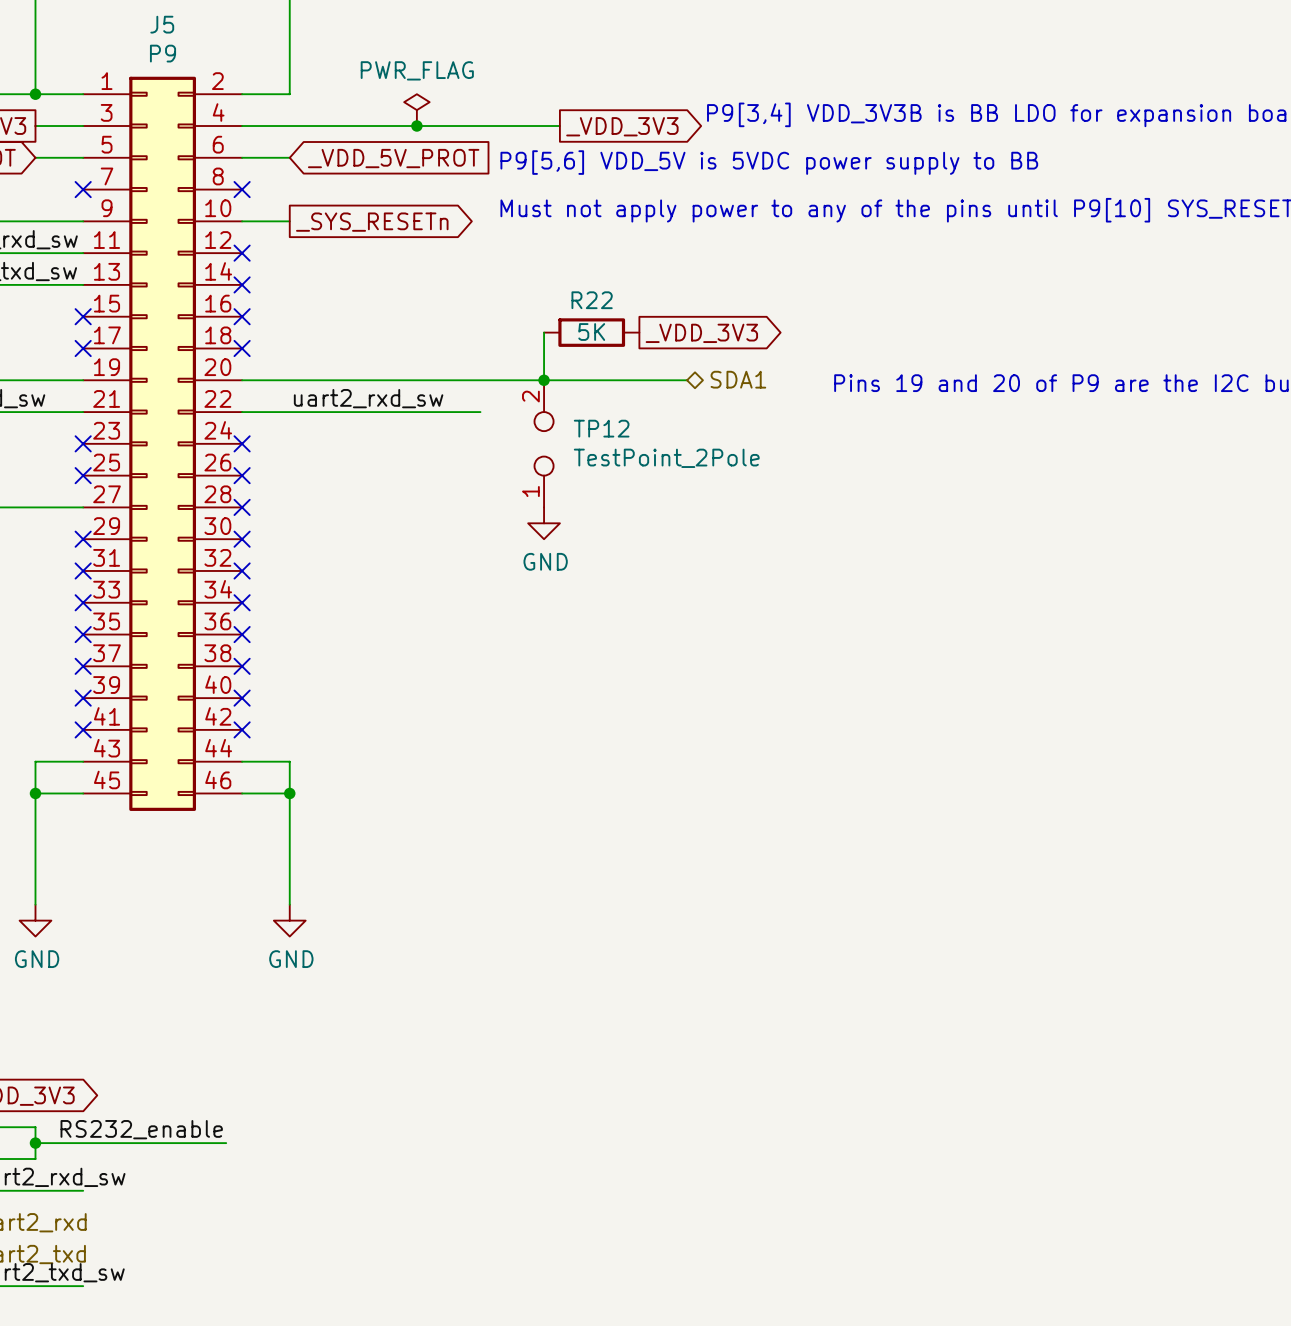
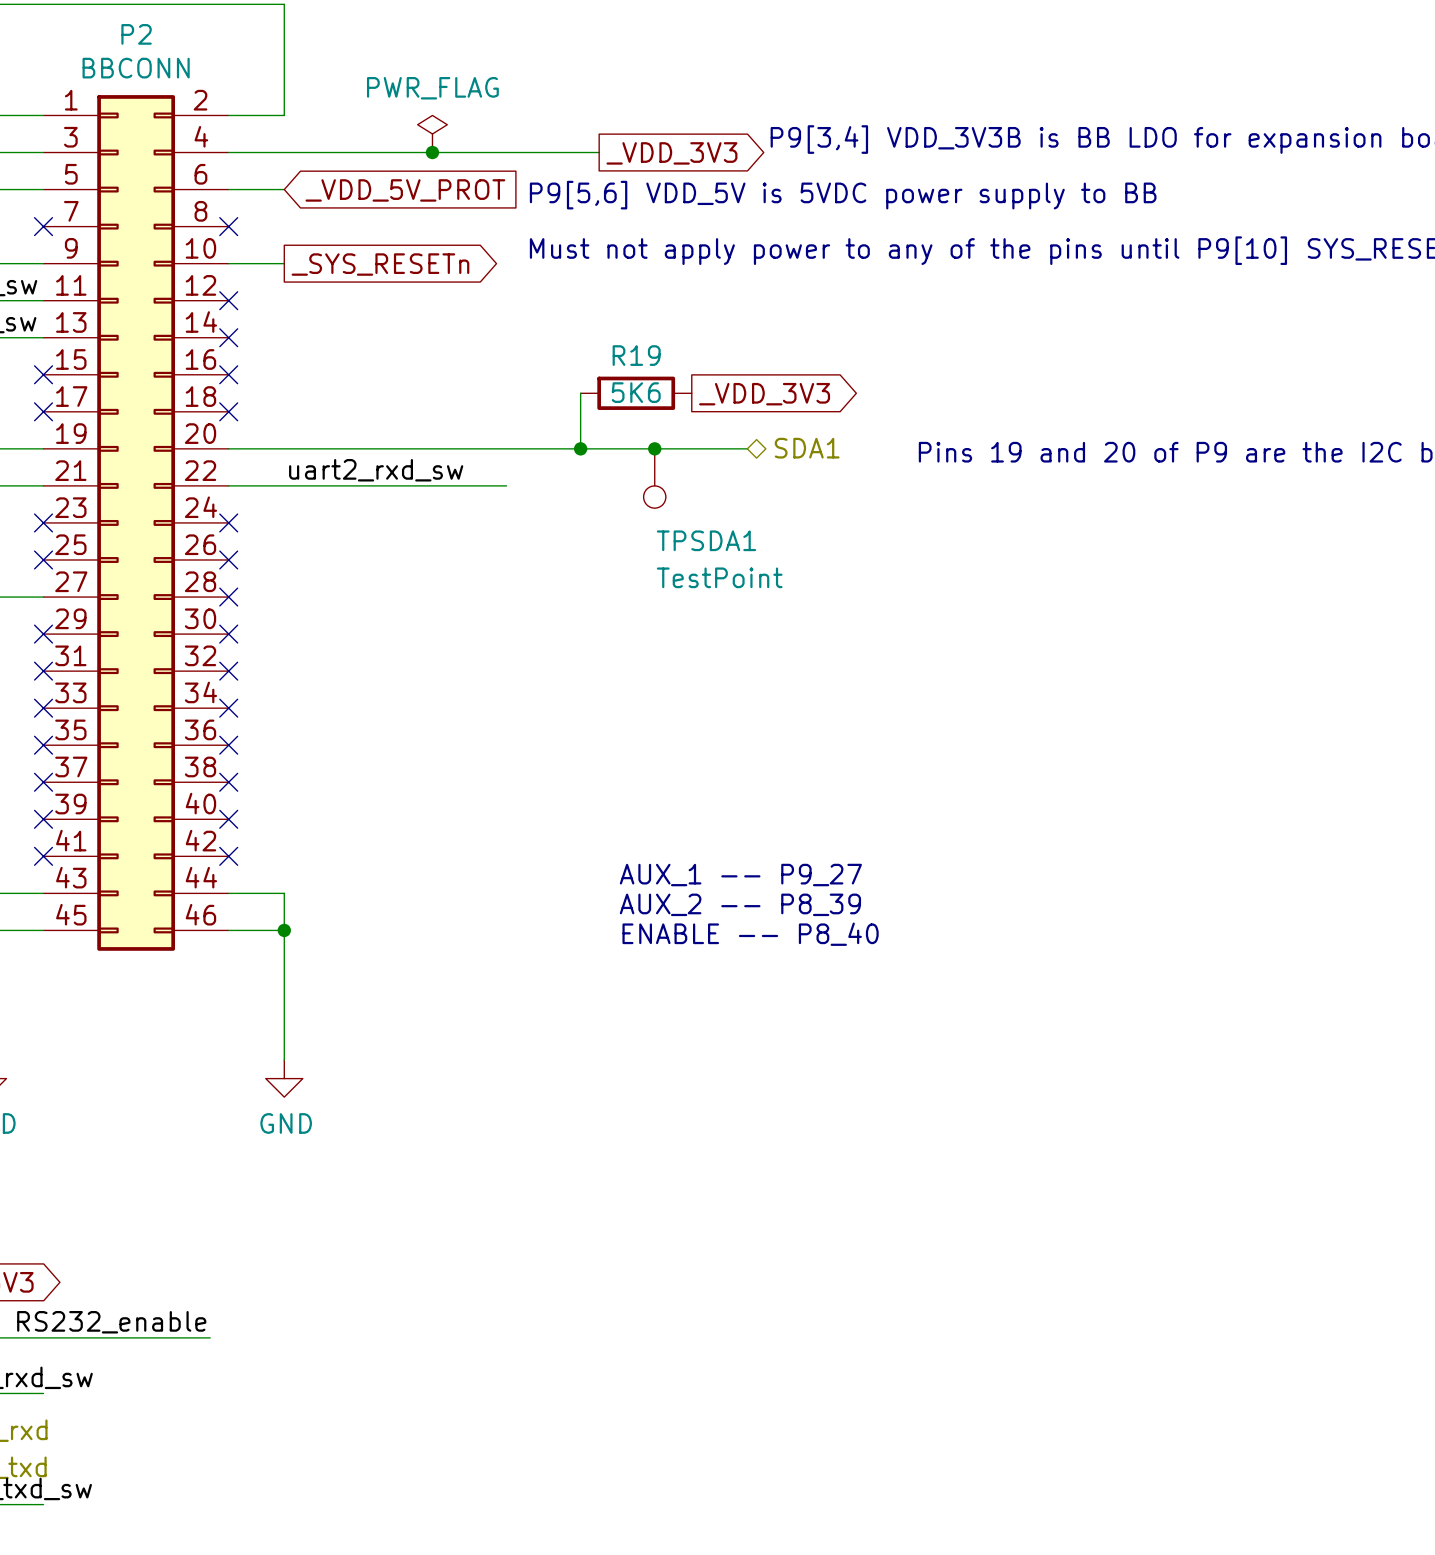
J5 name: J5 (162, 24) -> P2 (136, 34)
J5 value: P9 (163, 53) -> BBCONN (136, 68)
R22 name: R22 (592, 300) -> R19 (636, 355)
R22 value: 5K (591, 332) -> 5K6 (636, 392)
junction: none -> (654, 448)
TPSDA1: none -> TestPoint (654, 478)
TP12: TestPoint_2Pole (544, 443) -> none
power symbol: GND (544, 523) -> none
text: none -> AUX_1 -- P9_27 (740, 875)
text: none -> AUX_2 -- P8_39 (740, 904)
text: none -> ENABLE -- P8_40 (750, 934)

